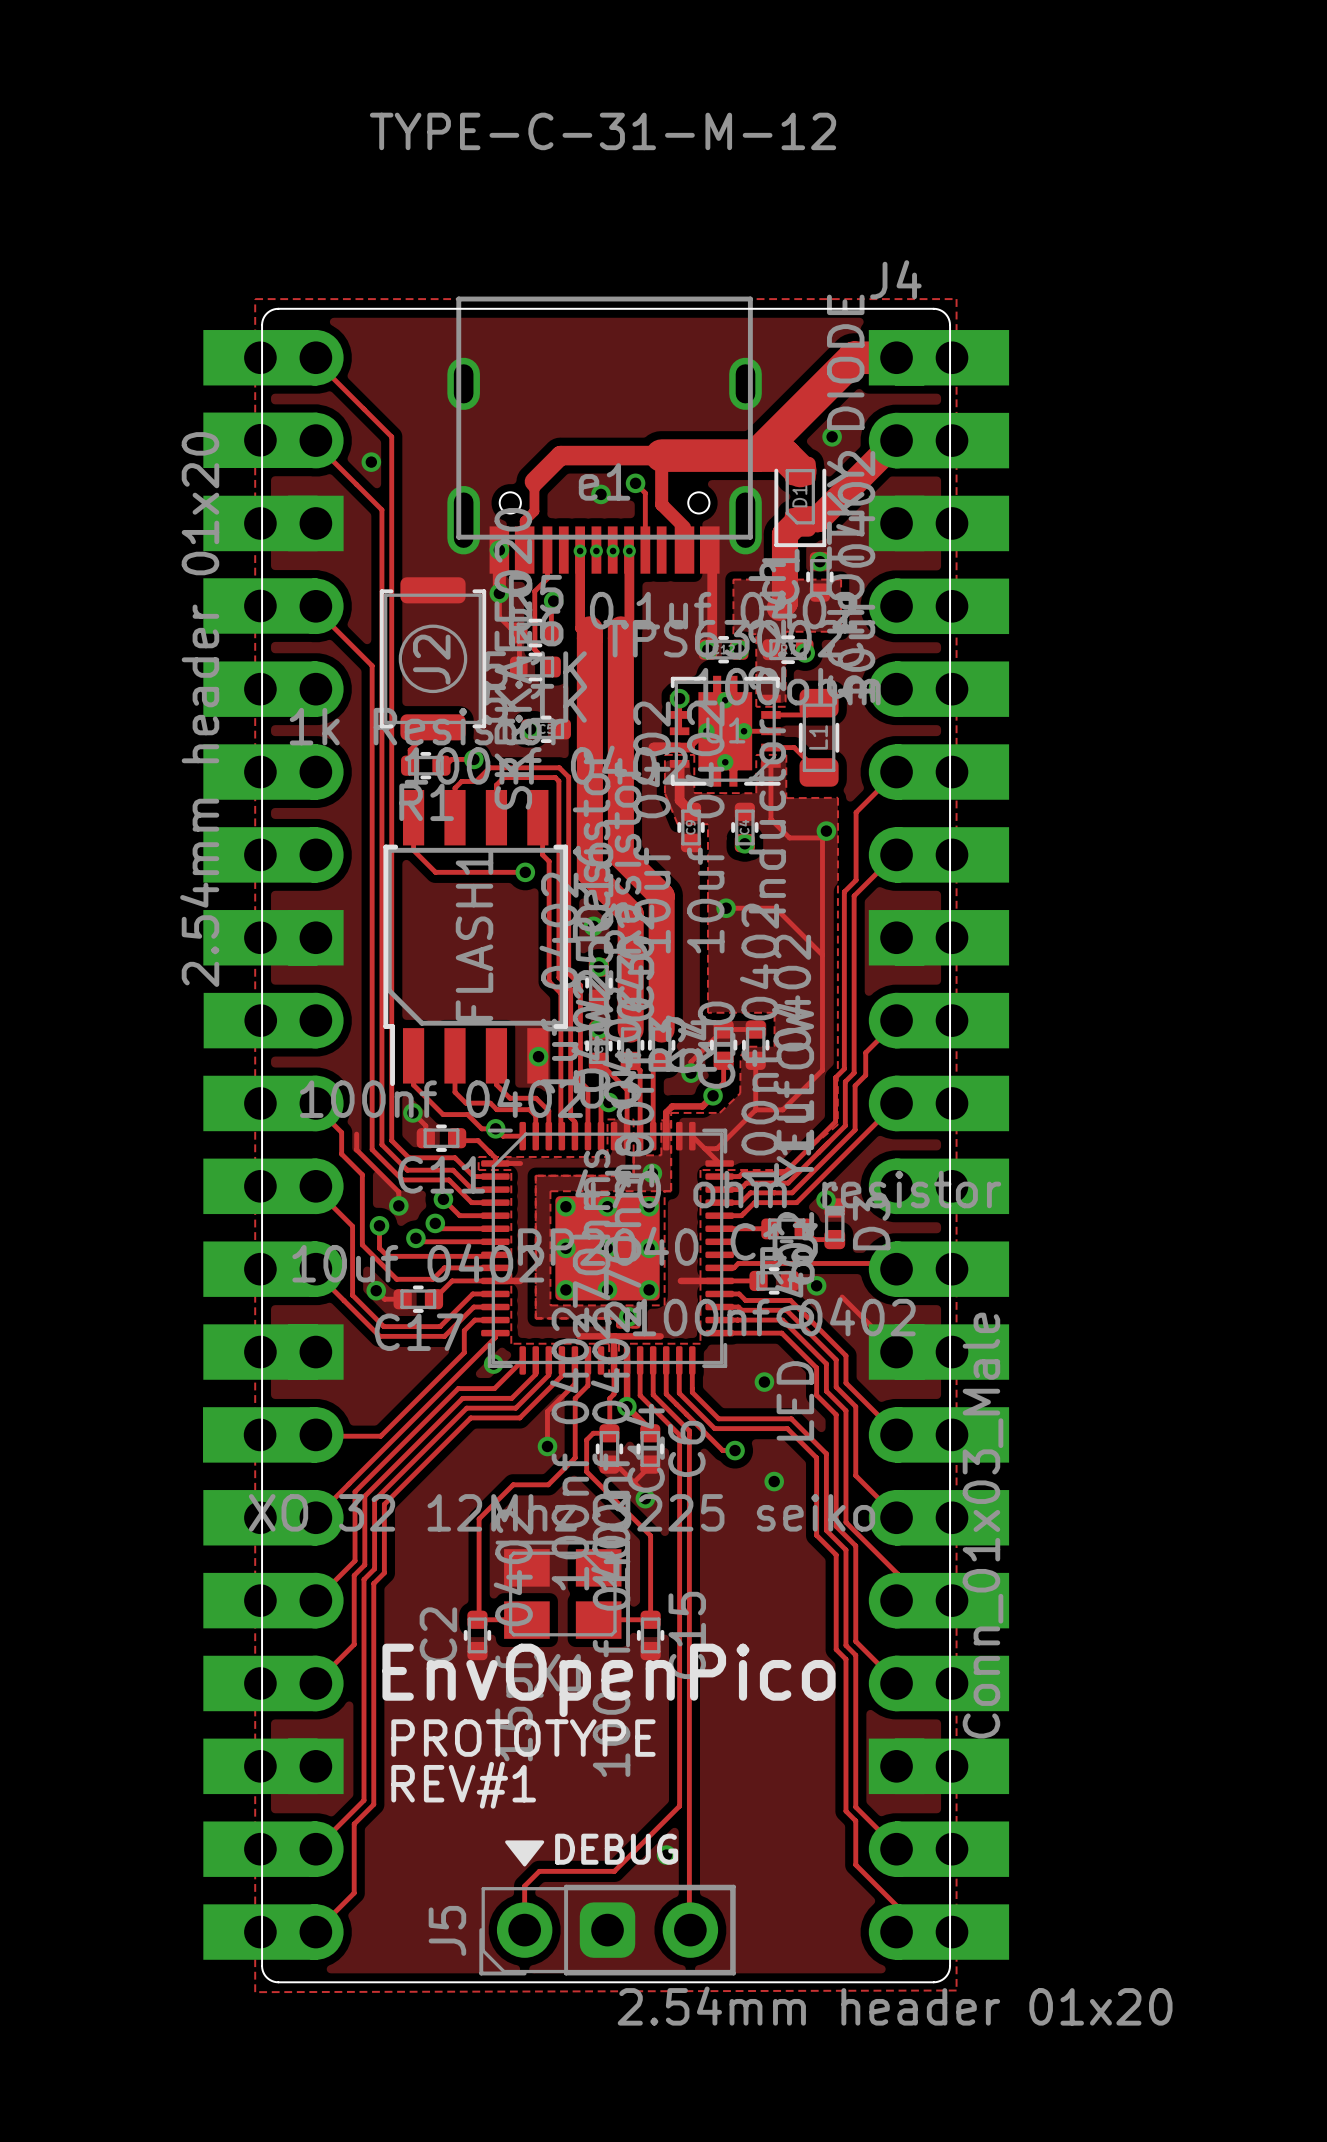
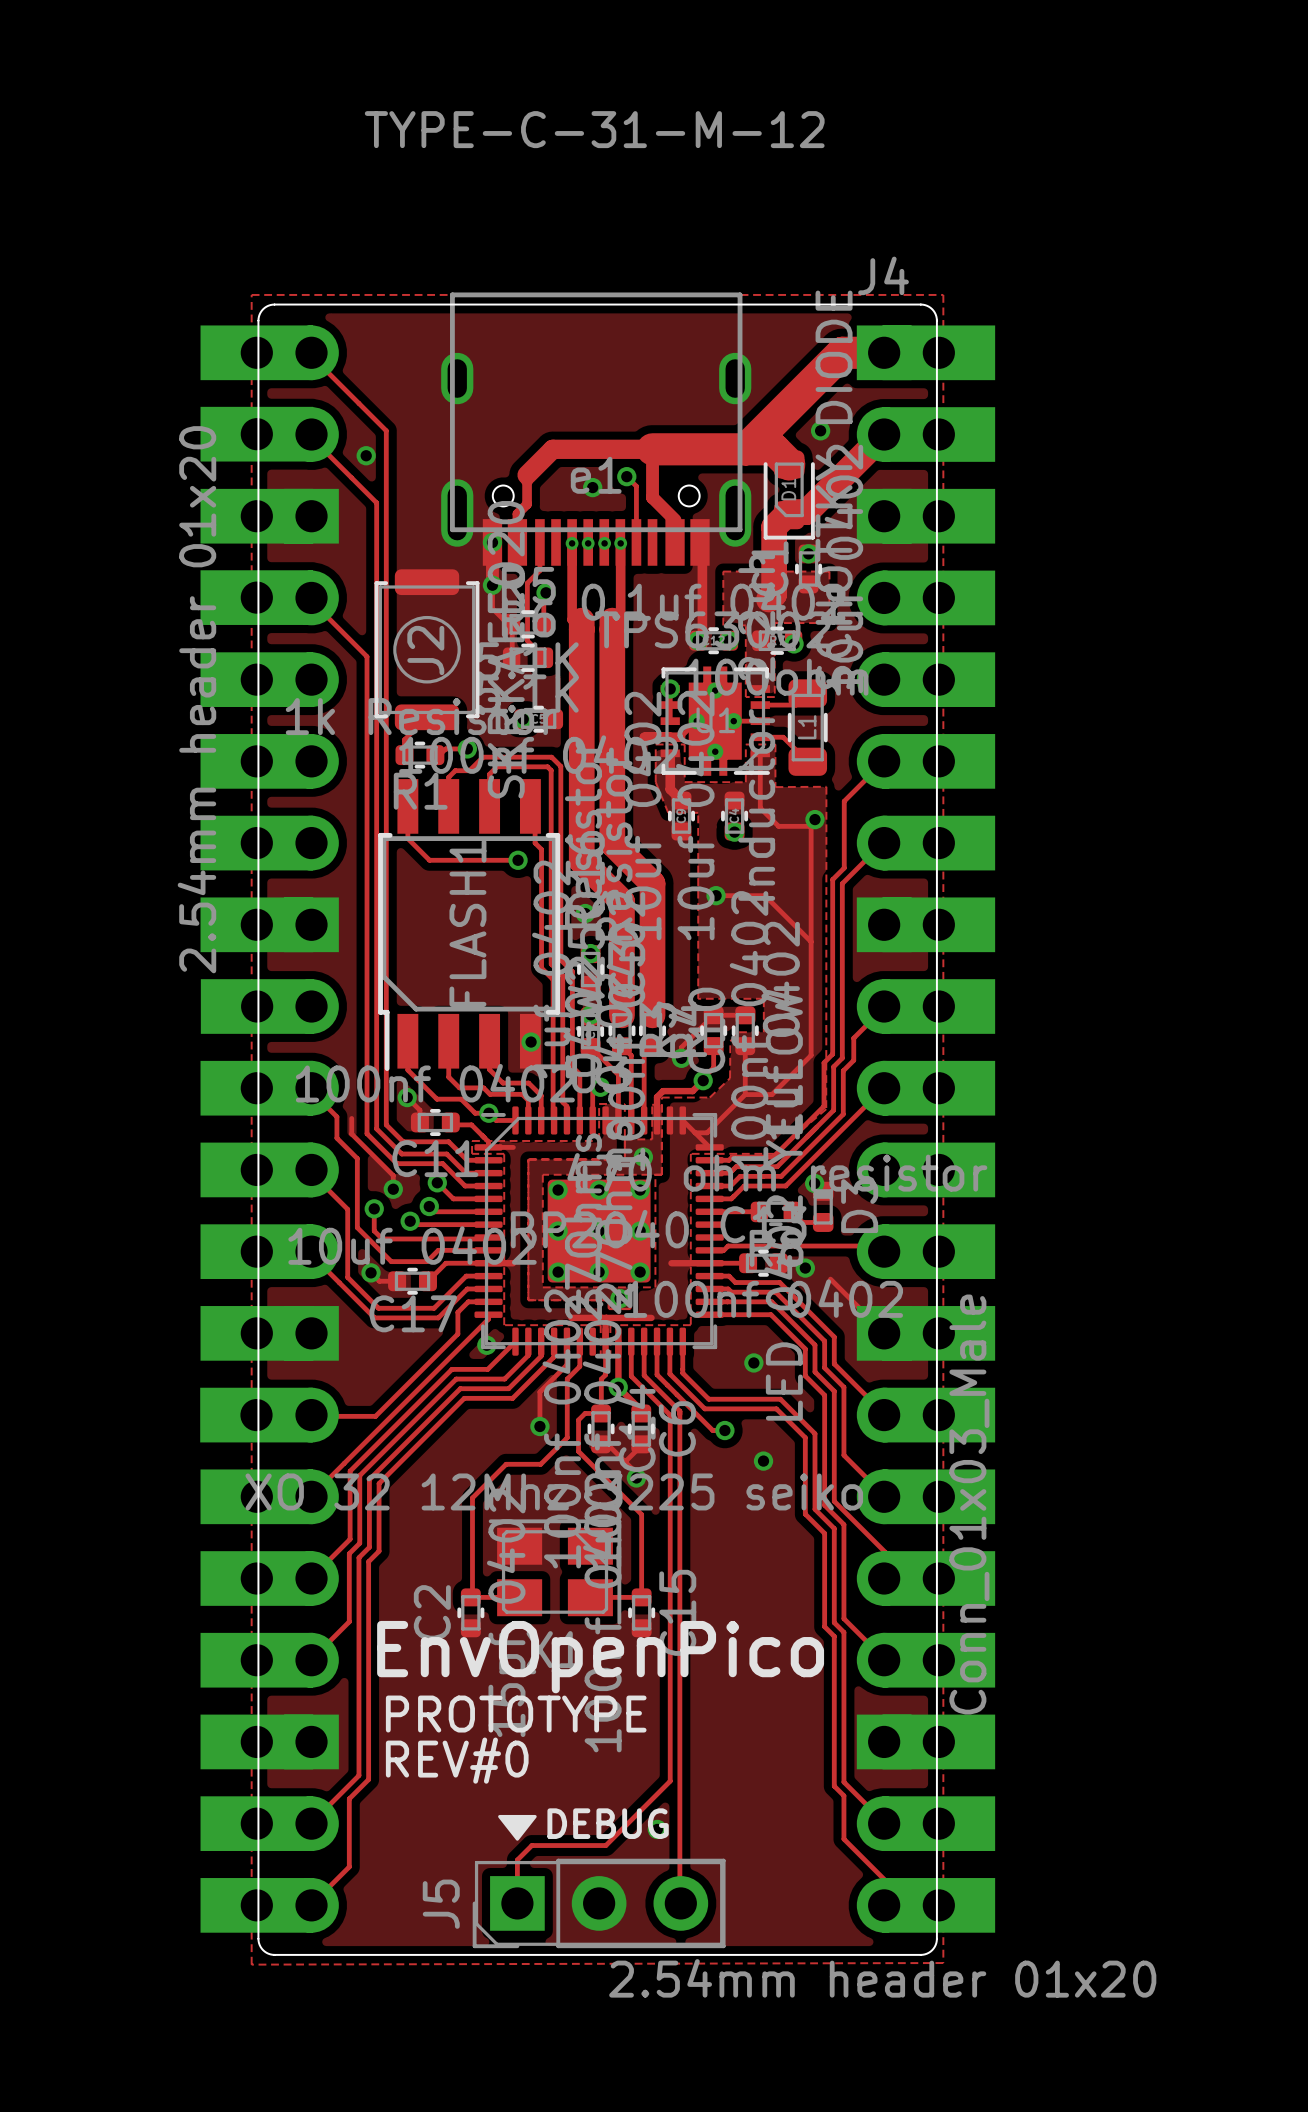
text: REV#1 (463, 1785) -> REV#0 (457, 1760)
J5 footprint: [479, 1884, 736, 1976] -> [472, 1858, 726, 1949]

